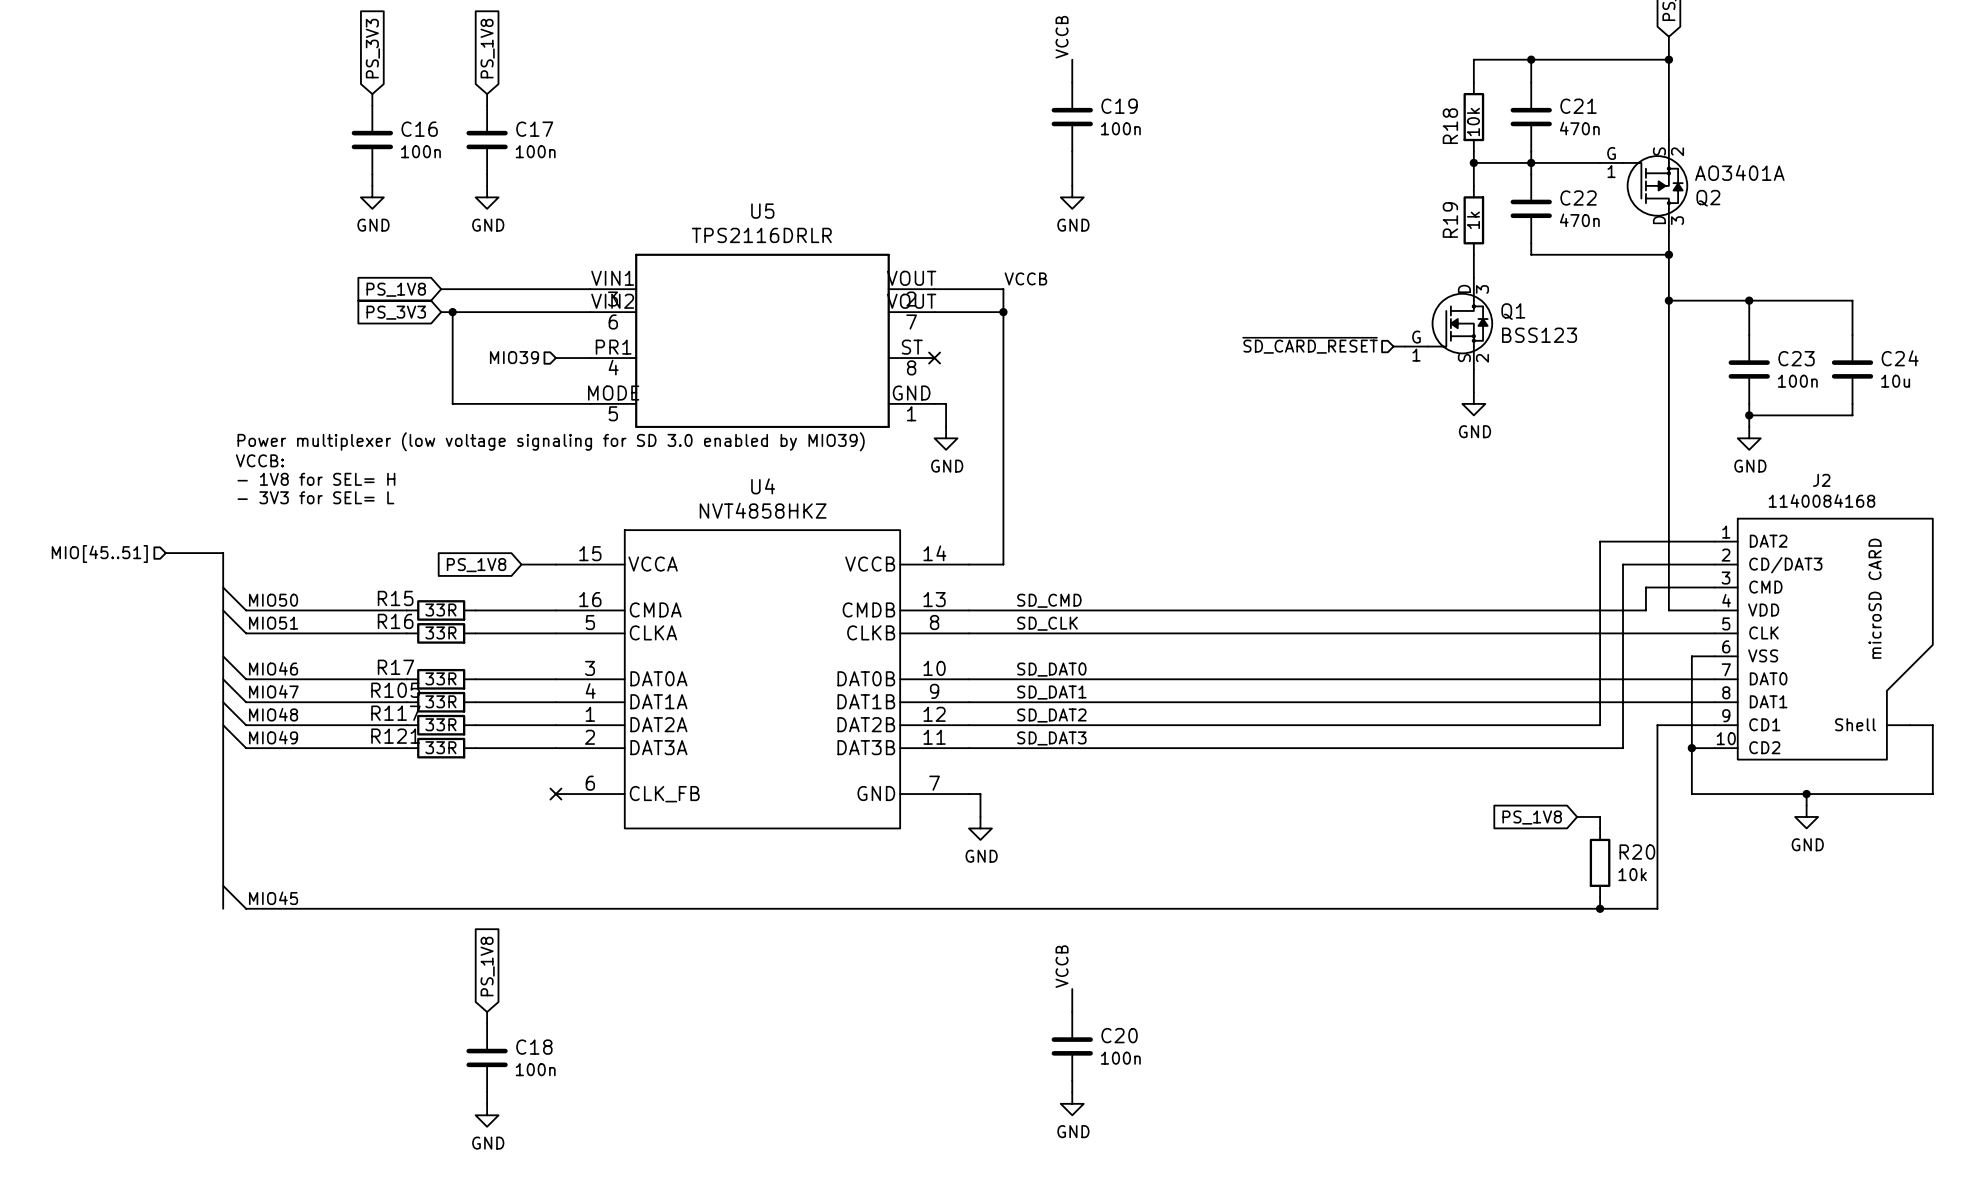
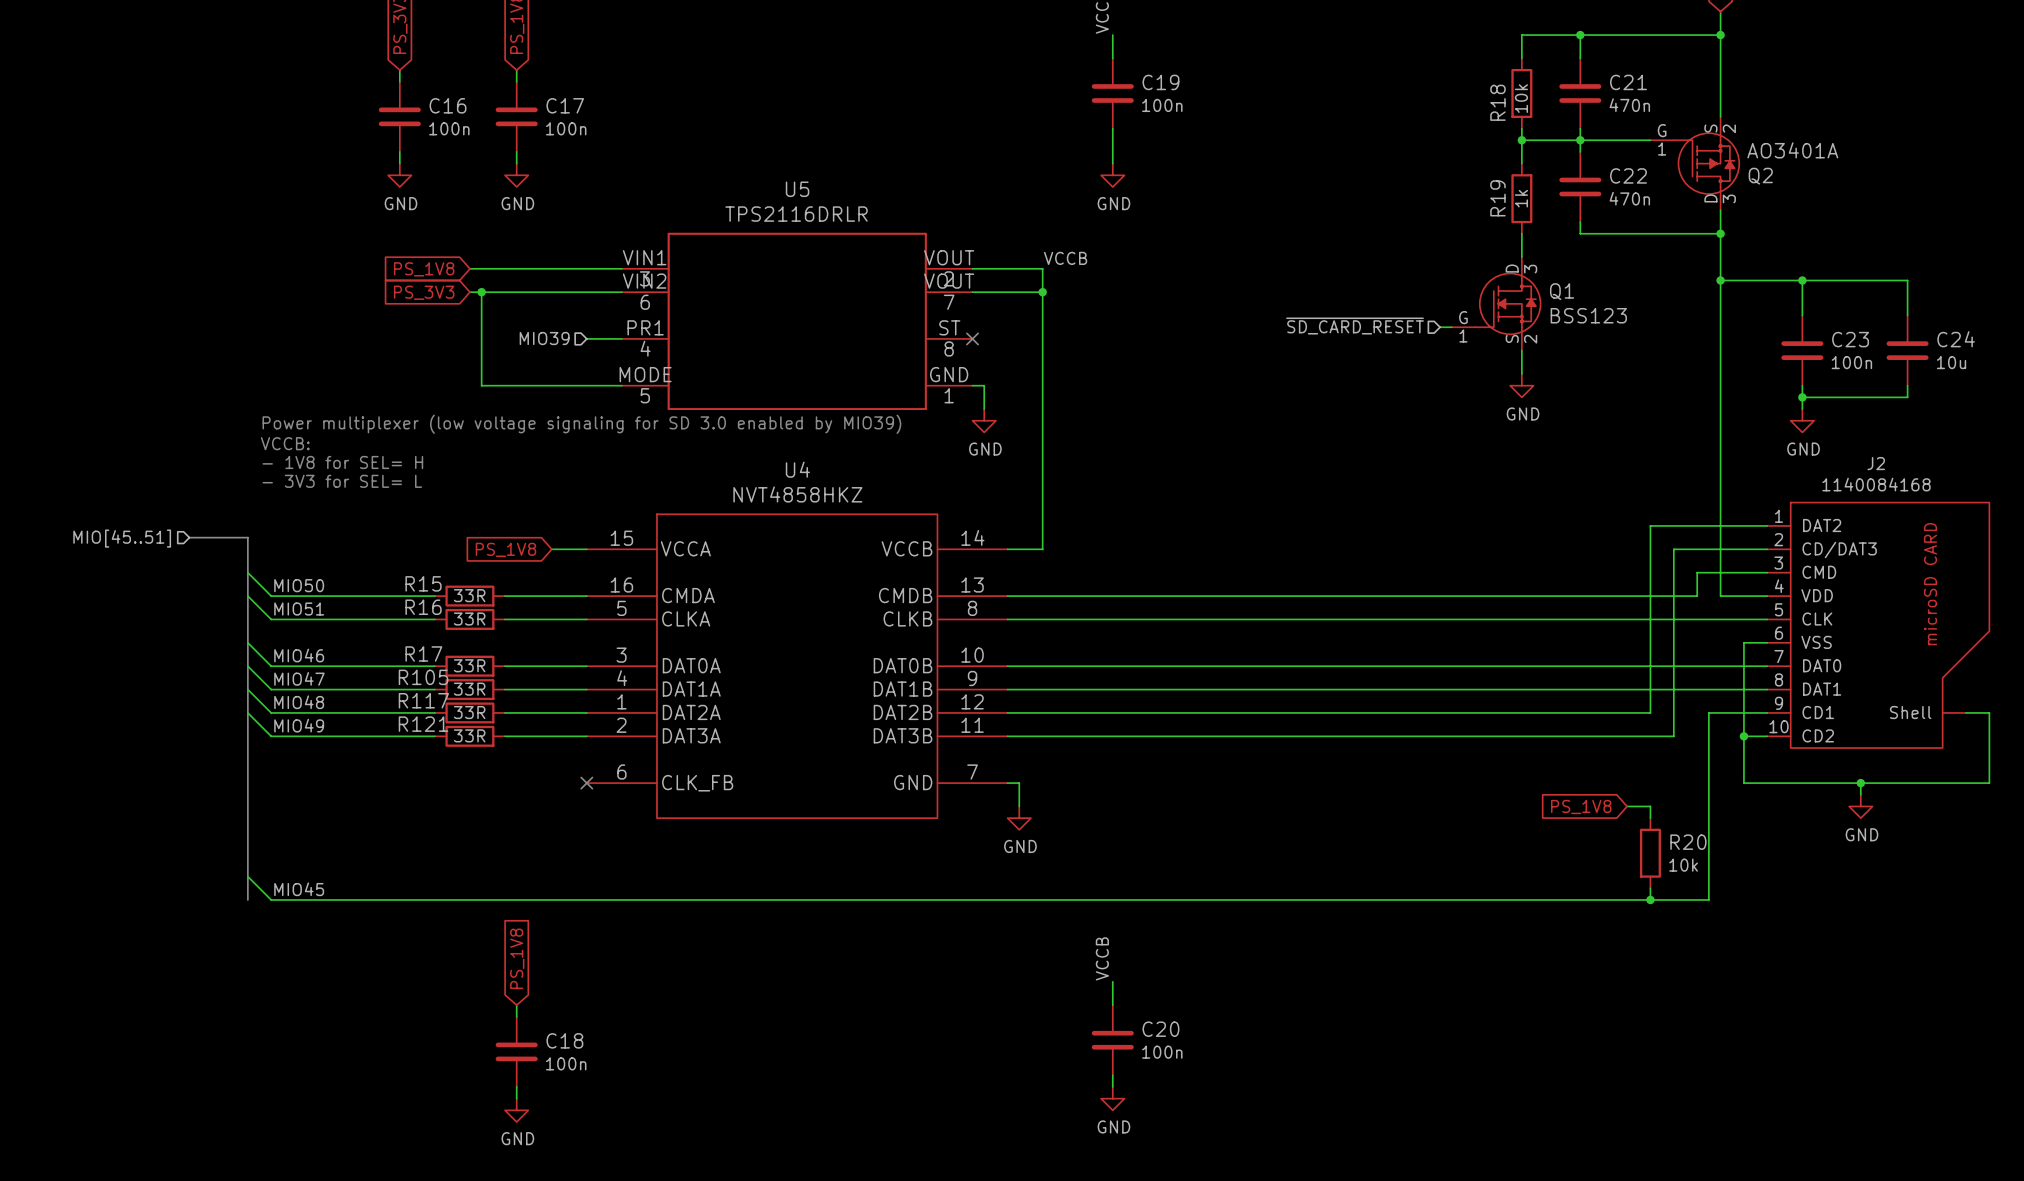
label: SD_CMD (1049, 600) -> none
label: SD_CLK (1047, 623) -> none
label: SD_DAT0 (1051, 669) -> none
label: SD_DAT1 (1051, 692) -> none
label: SD_DAT2 (1051, 715) -> none
label: SD_DAT3 (1051, 738) -> none

